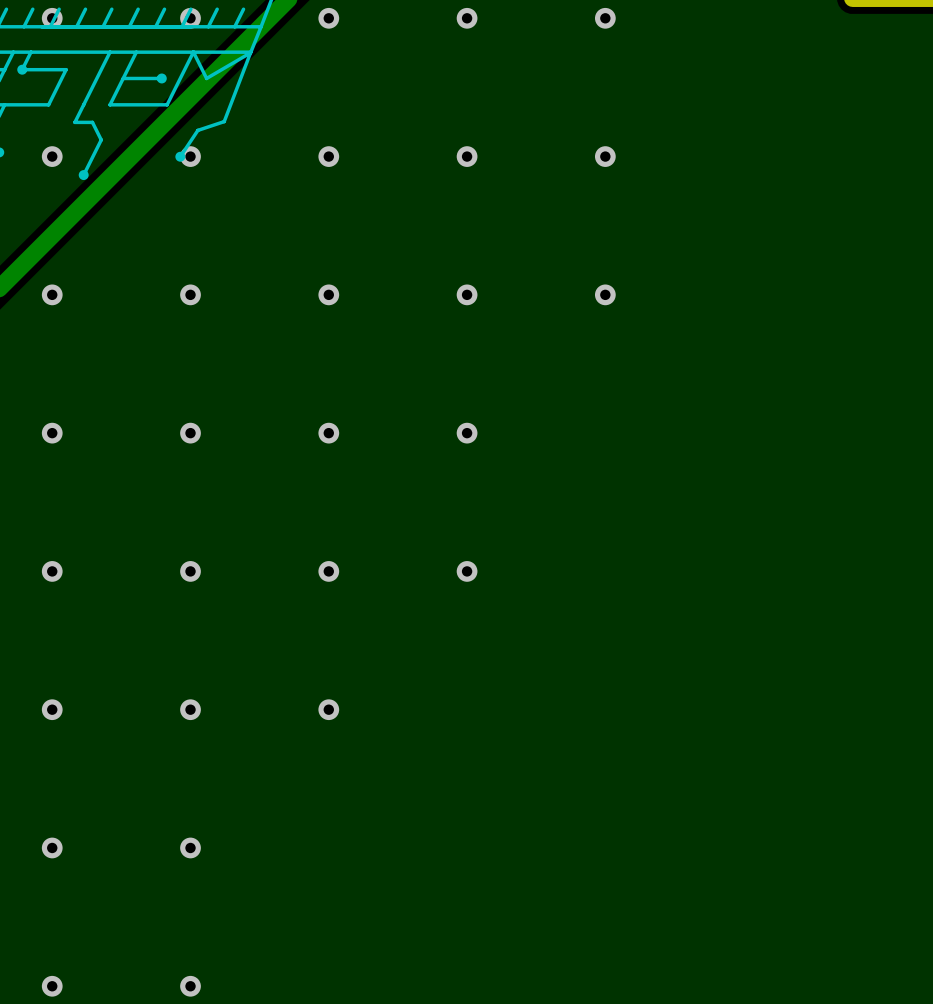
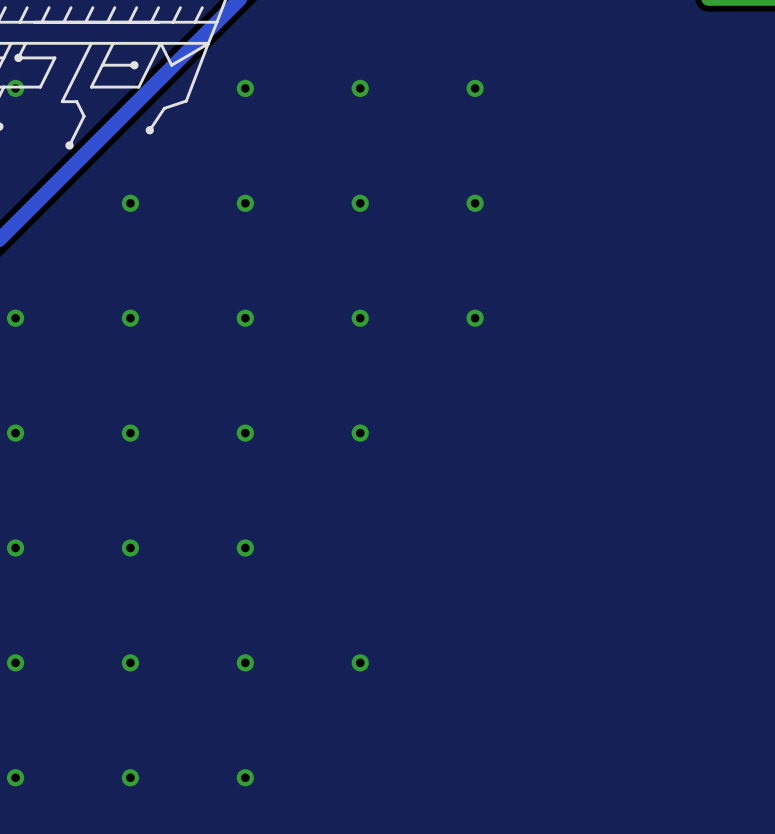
via: (52, 18) -> none
via: (190, 18) -> none
via: (328, 18) -> none
via: (467, 18) -> none
via: (605, 18) -> none
via: none -> (15, 88)
via: none -> (245, 88)
via: none -> (360, 88)
via: none -> (475, 88)
via: (52, 156) -> none
via: (190, 156) -> none
via: (328, 156) -> none
via: (467, 156) -> none
via: (605, 156) -> none
via: none -> (130, 203)
via: none -> (245, 203)
via: none -> (360, 203)
via: none -> (475, 203)
via: (52, 294) -> none
via: (190, 294) -> none
via: (328, 294) -> none
via: (467, 294) -> none
via: (605, 294) -> none
via: none -> (15, 318)
via: none -> (130, 318)
via: none -> (245, 318)
via: none -> (360, 318)
via: none -> (475, 318)
via: (52, 433) -> none
via: (190, 433) -> none
via: (328, 433) -> none
via: (467, 433) -> none
via: none -> (15, 433)
via: none -> (130, 433)
via: none -> (245, 433)
via: none -> (360, 433)
via: (52, 571) -> none
via: (190, 571) -> none
via: (328, 571) -> none
via: (467, 571) -> none
via: none -> (15, 547)
via: none -> (130, 547)
via: none -> (245, 547)
via: (52, 709) -> none
via: (190, 709) -> none
via: (328, 709) -> none
via: none -> (15, 662)
via: none -> (130, 662)
via: none -> (245, 662)
via: none -> (360, 662)
via: (52, 847) -> none
via: (190, 847) -> none
via: none -> (15, 777)
via: none -> (130, 777)
via: none -> (245, 777)
via: (52, 986) -> none
via: (190, 986) -> none

